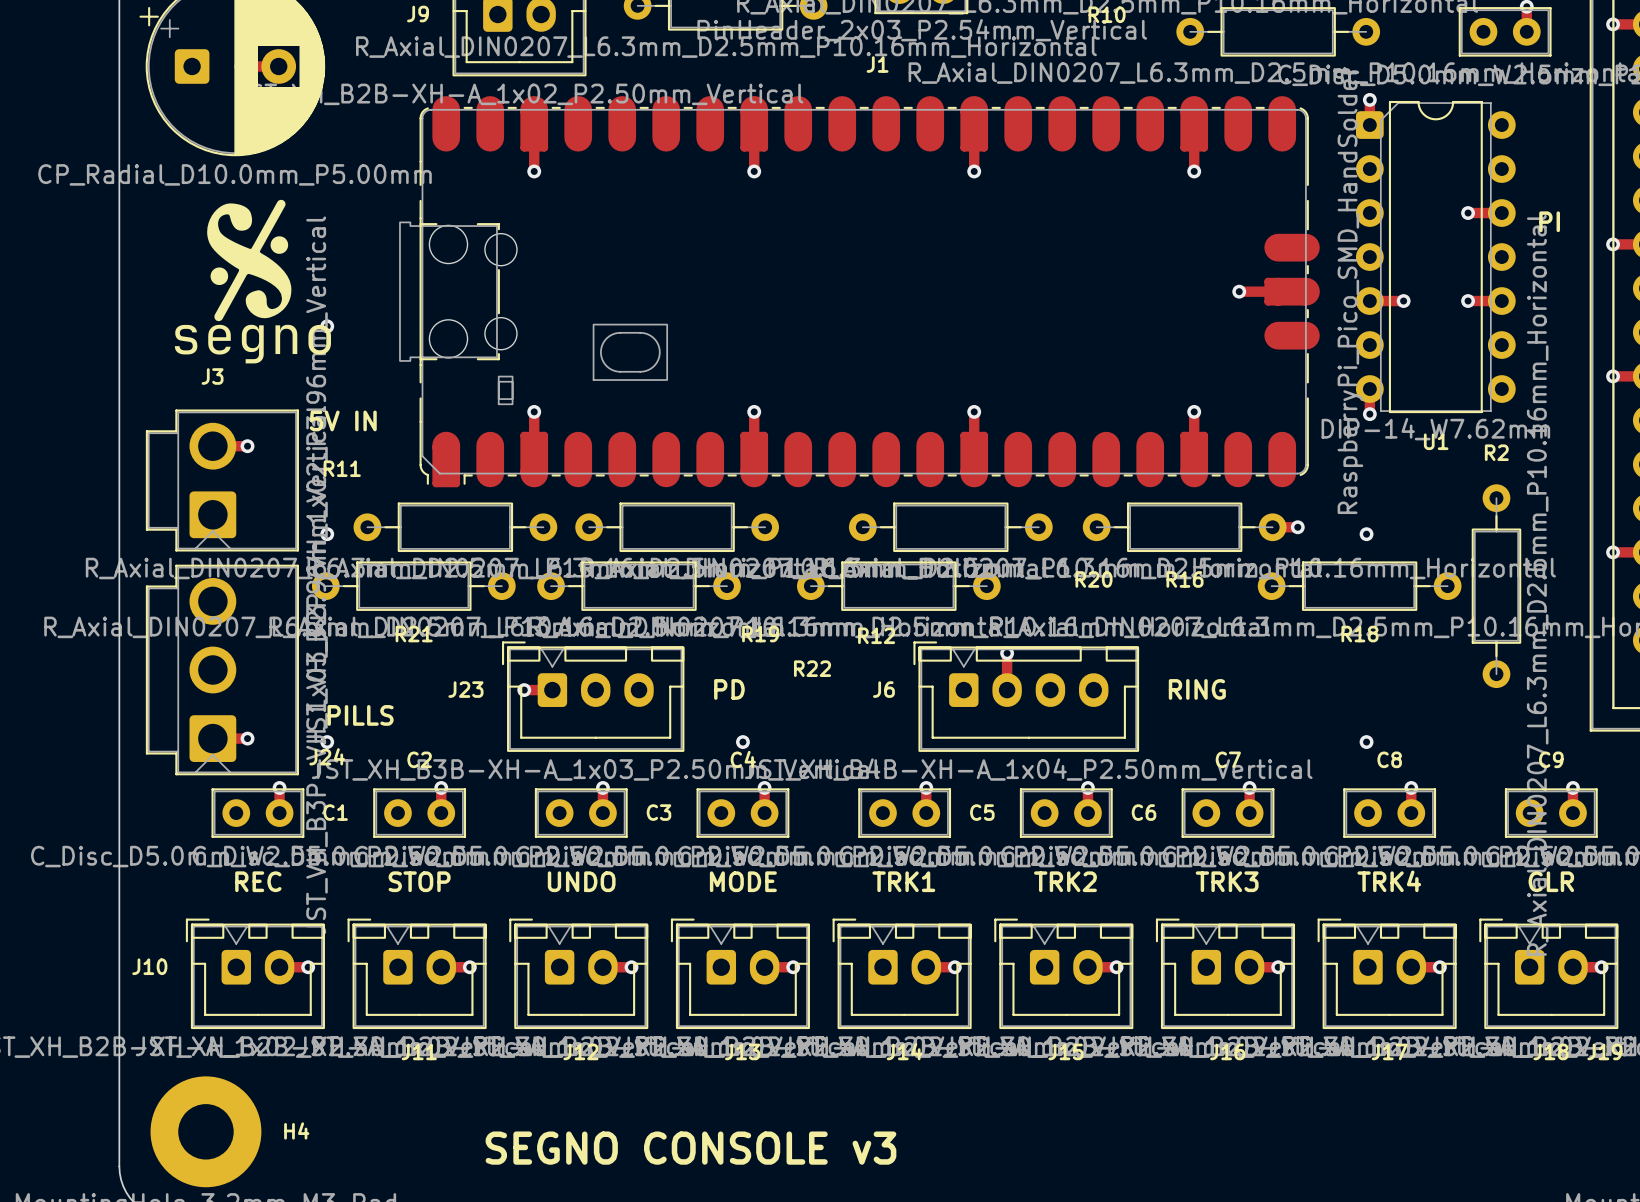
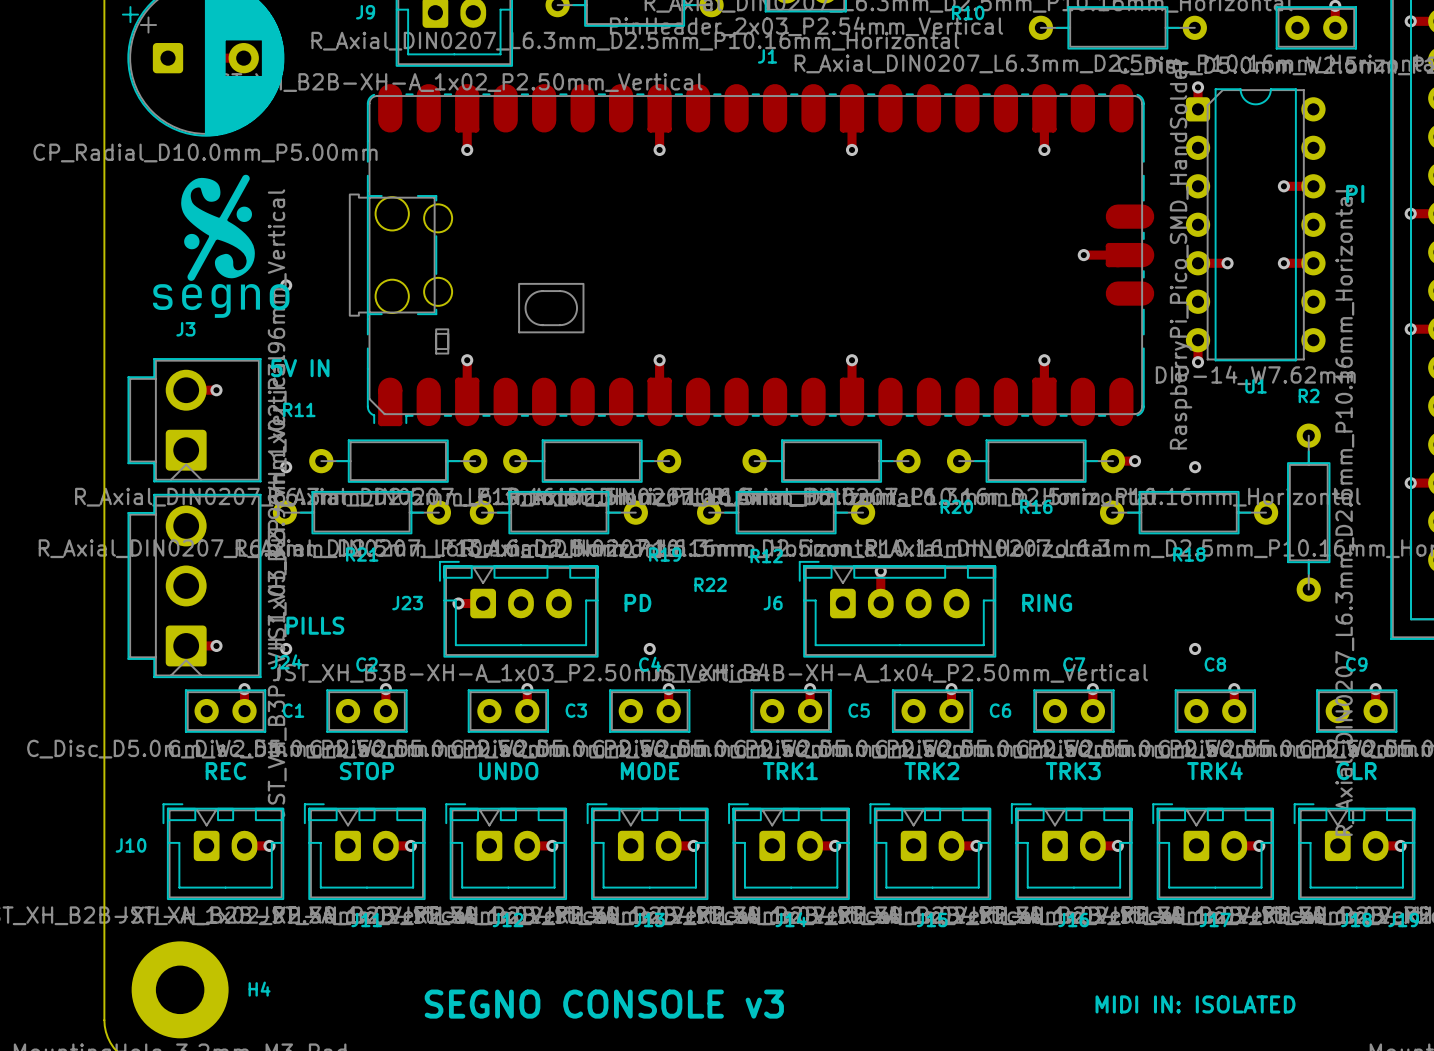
text: none -> MIDI IN: ISOLATED (1195, 1004)

